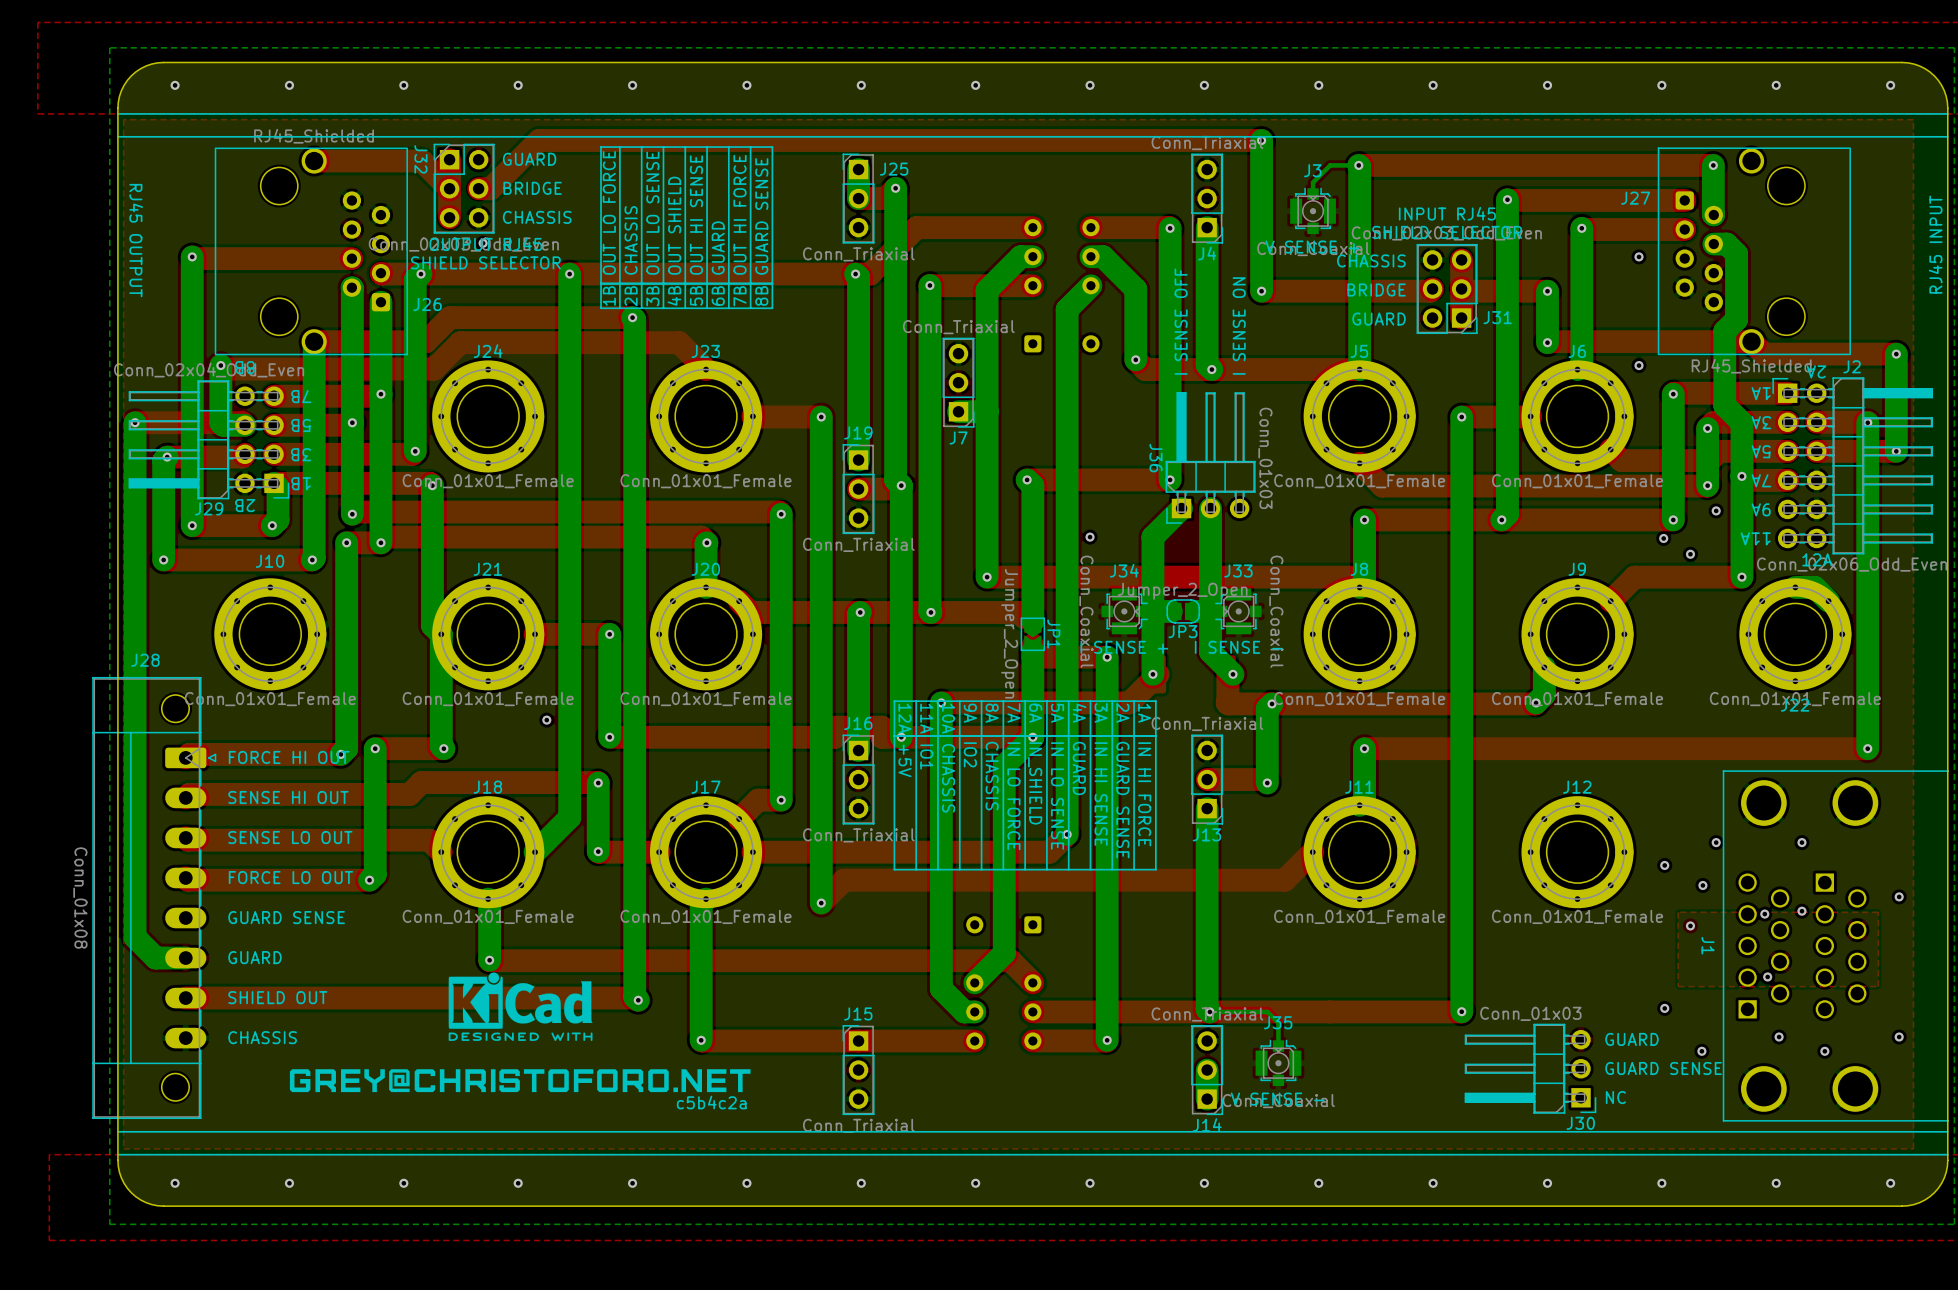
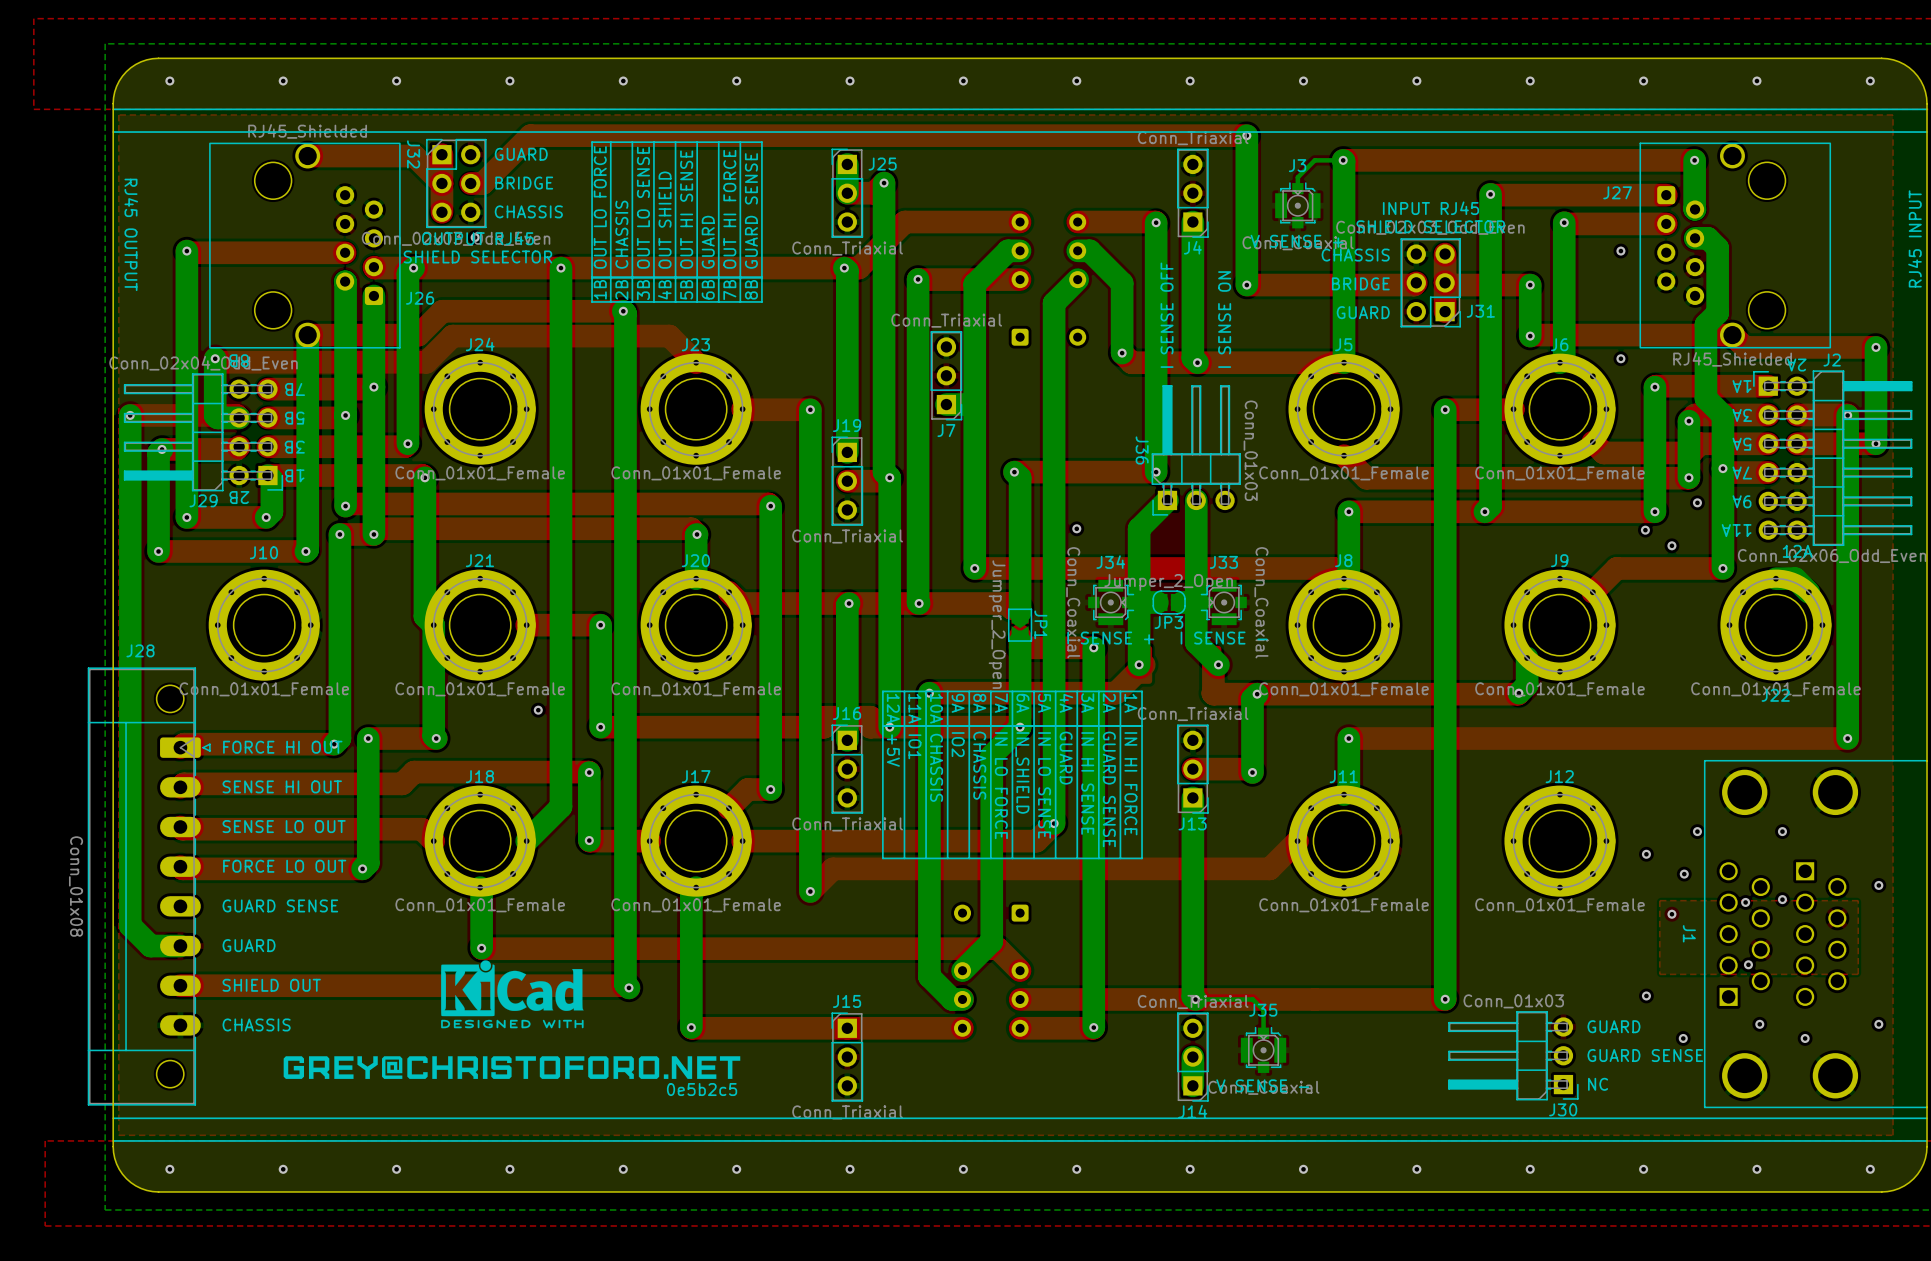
text: c5b4c2a (711, 1102) -> 0e5b2c5 (702, 1089)

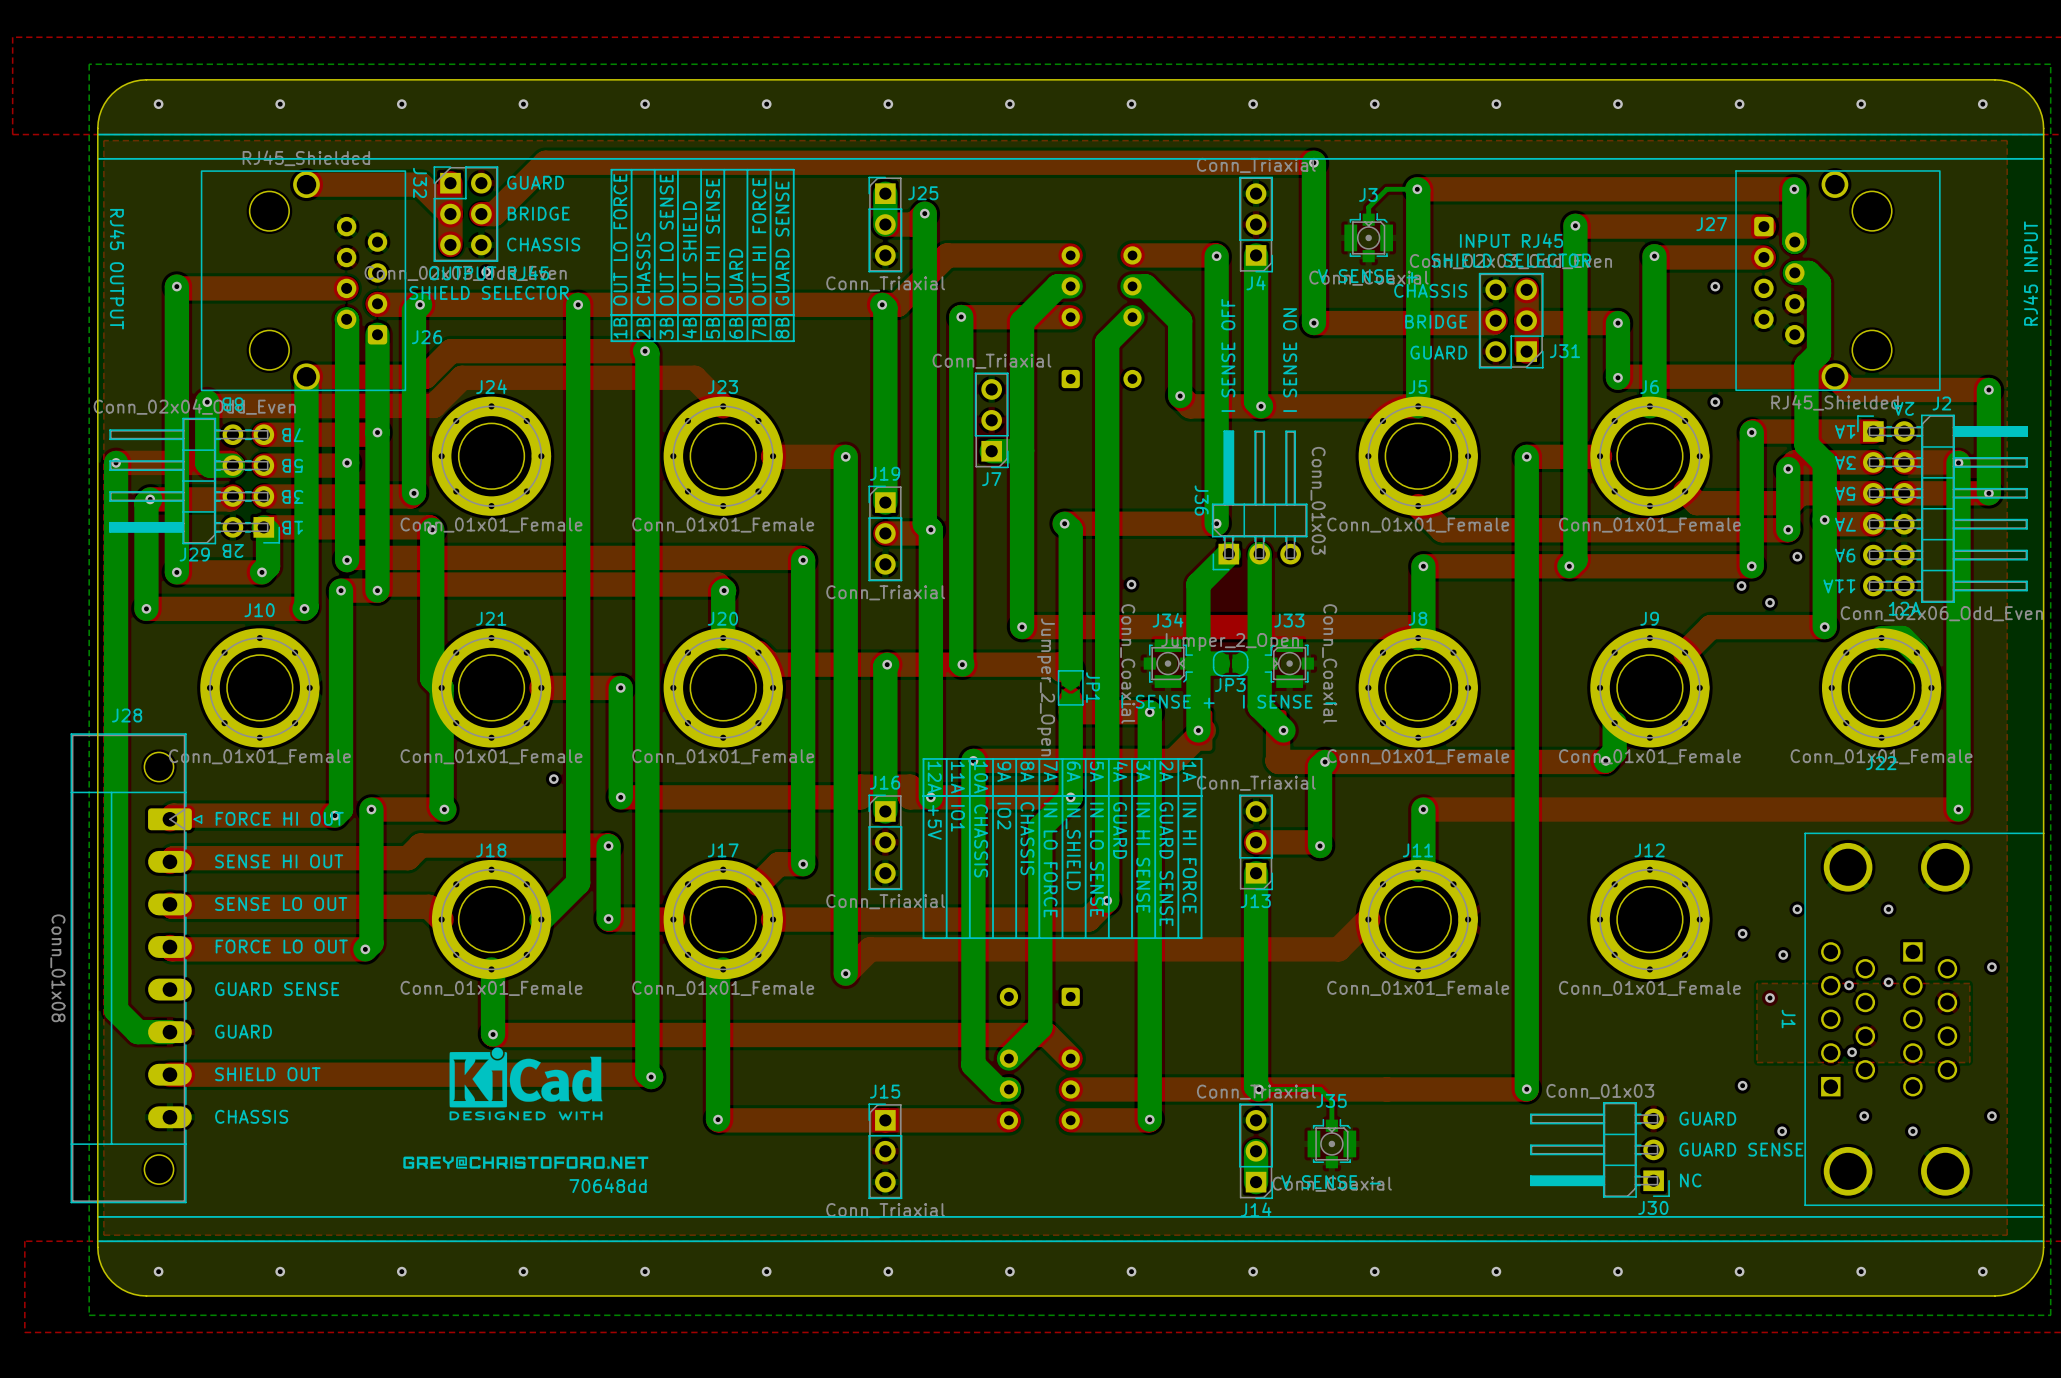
drawing shape: [283, 1056, 741, 1079] -> [403, 1156, 649, 1169]
text: none -> 70648dd (608, 1185)
text: 0e5b2c5 (702, 1089) -> none

